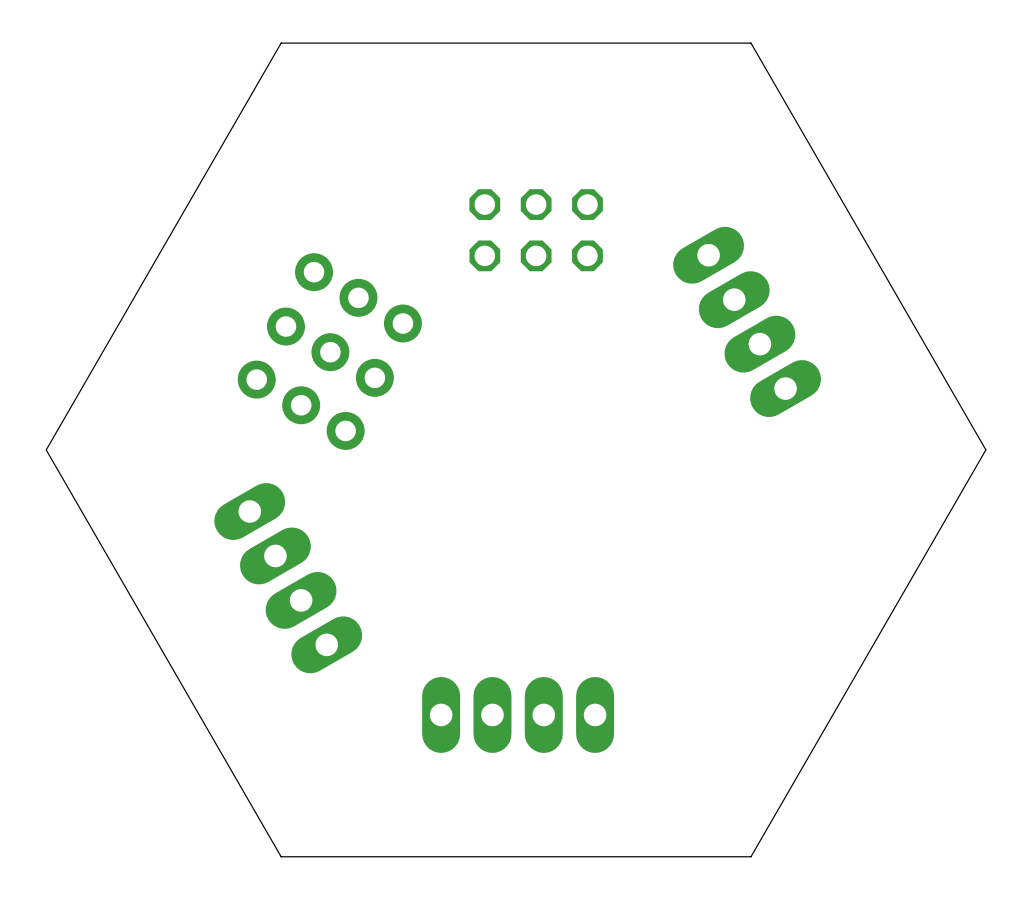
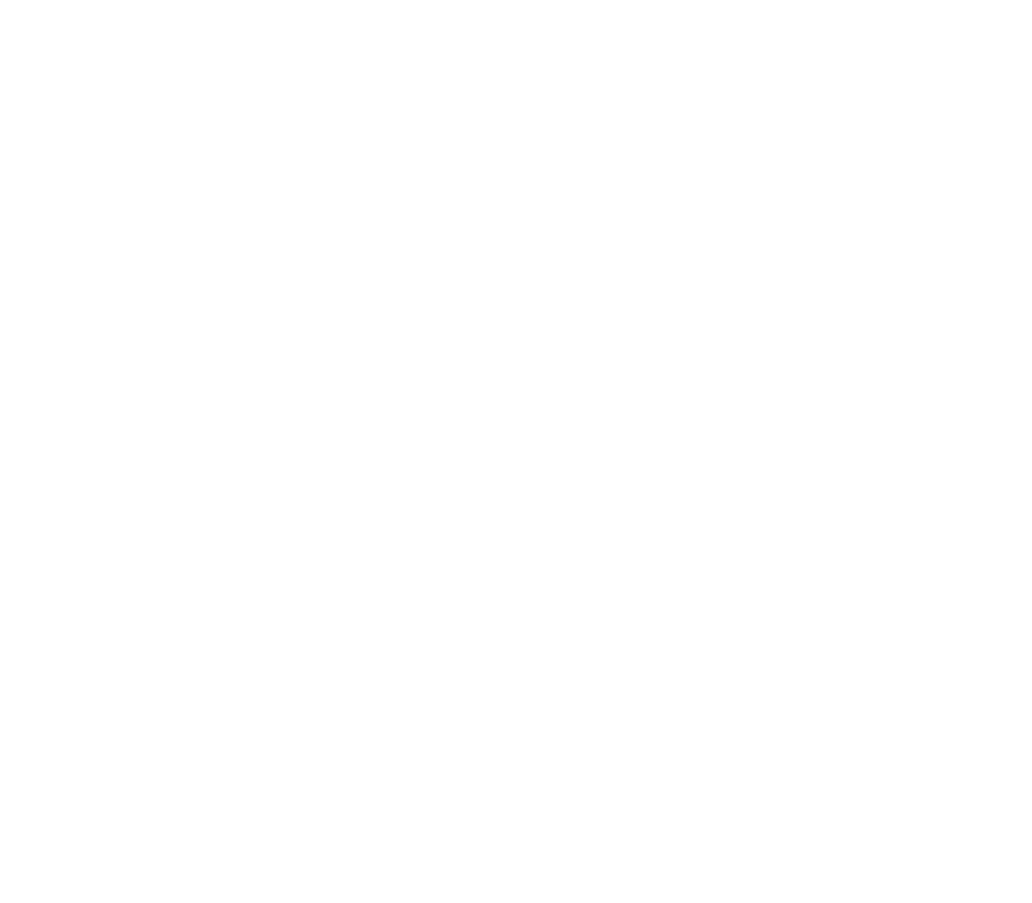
board edge: (750, 43) (985, 449) (750, 856) (281, 856) (46, 449) (281, 43) (750, 43) -> none
part: (536, 230) -> none
part: (358, 297) -> none
part: (747, 321) -> none
part: (330, 352) -> none
part: (301, 405) -> none
part: (288, 578) -> none
part: (518, 714) -> none

